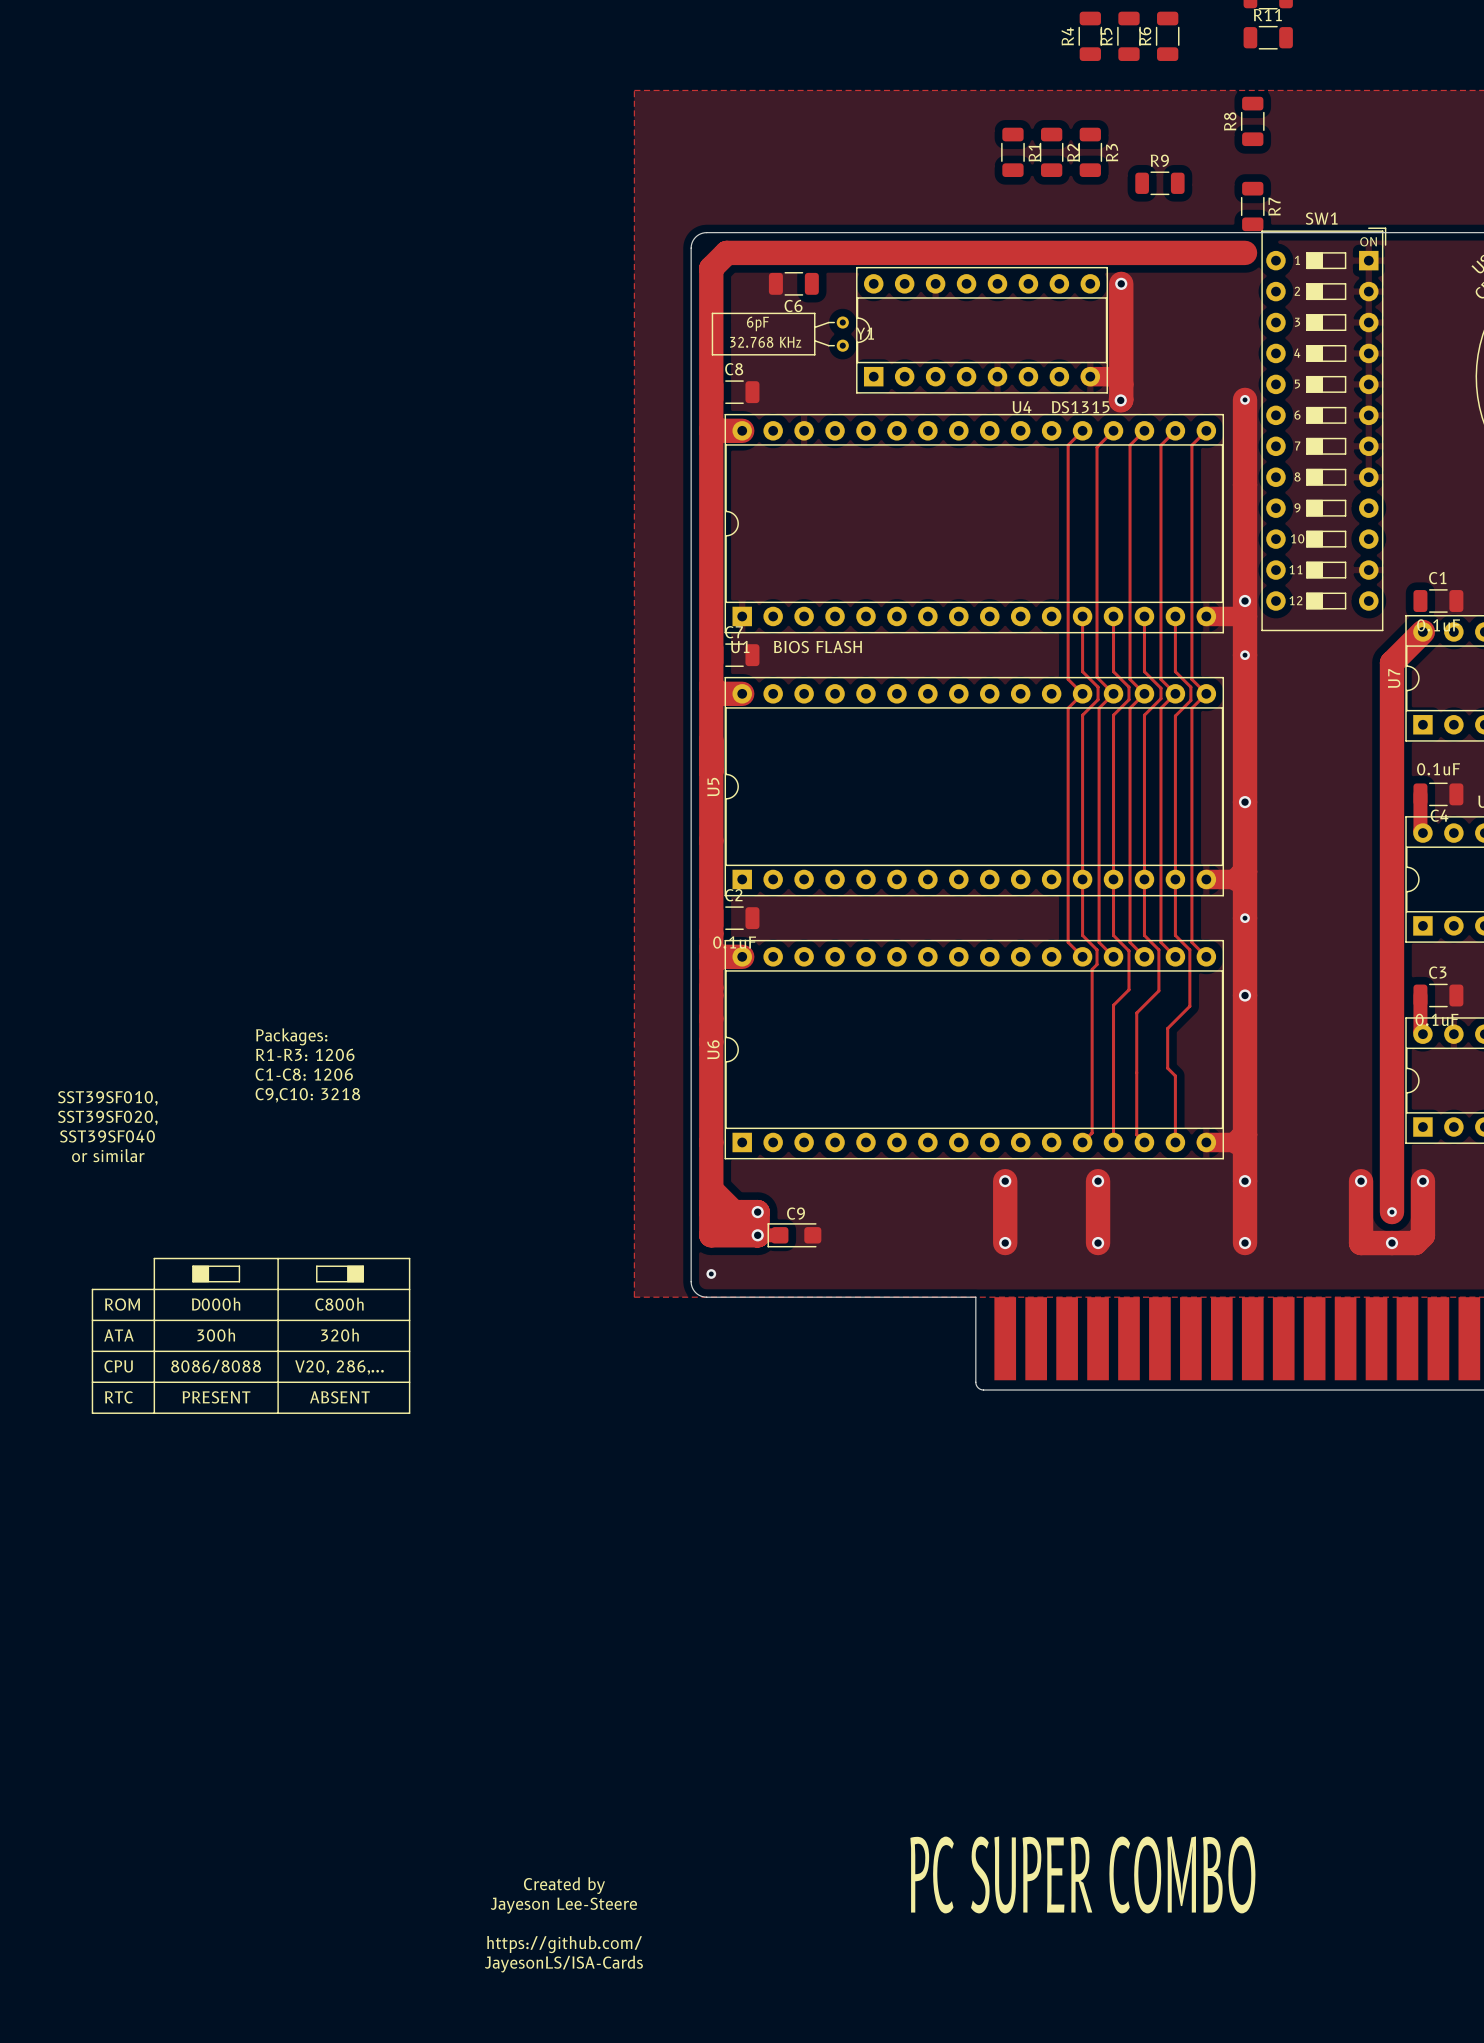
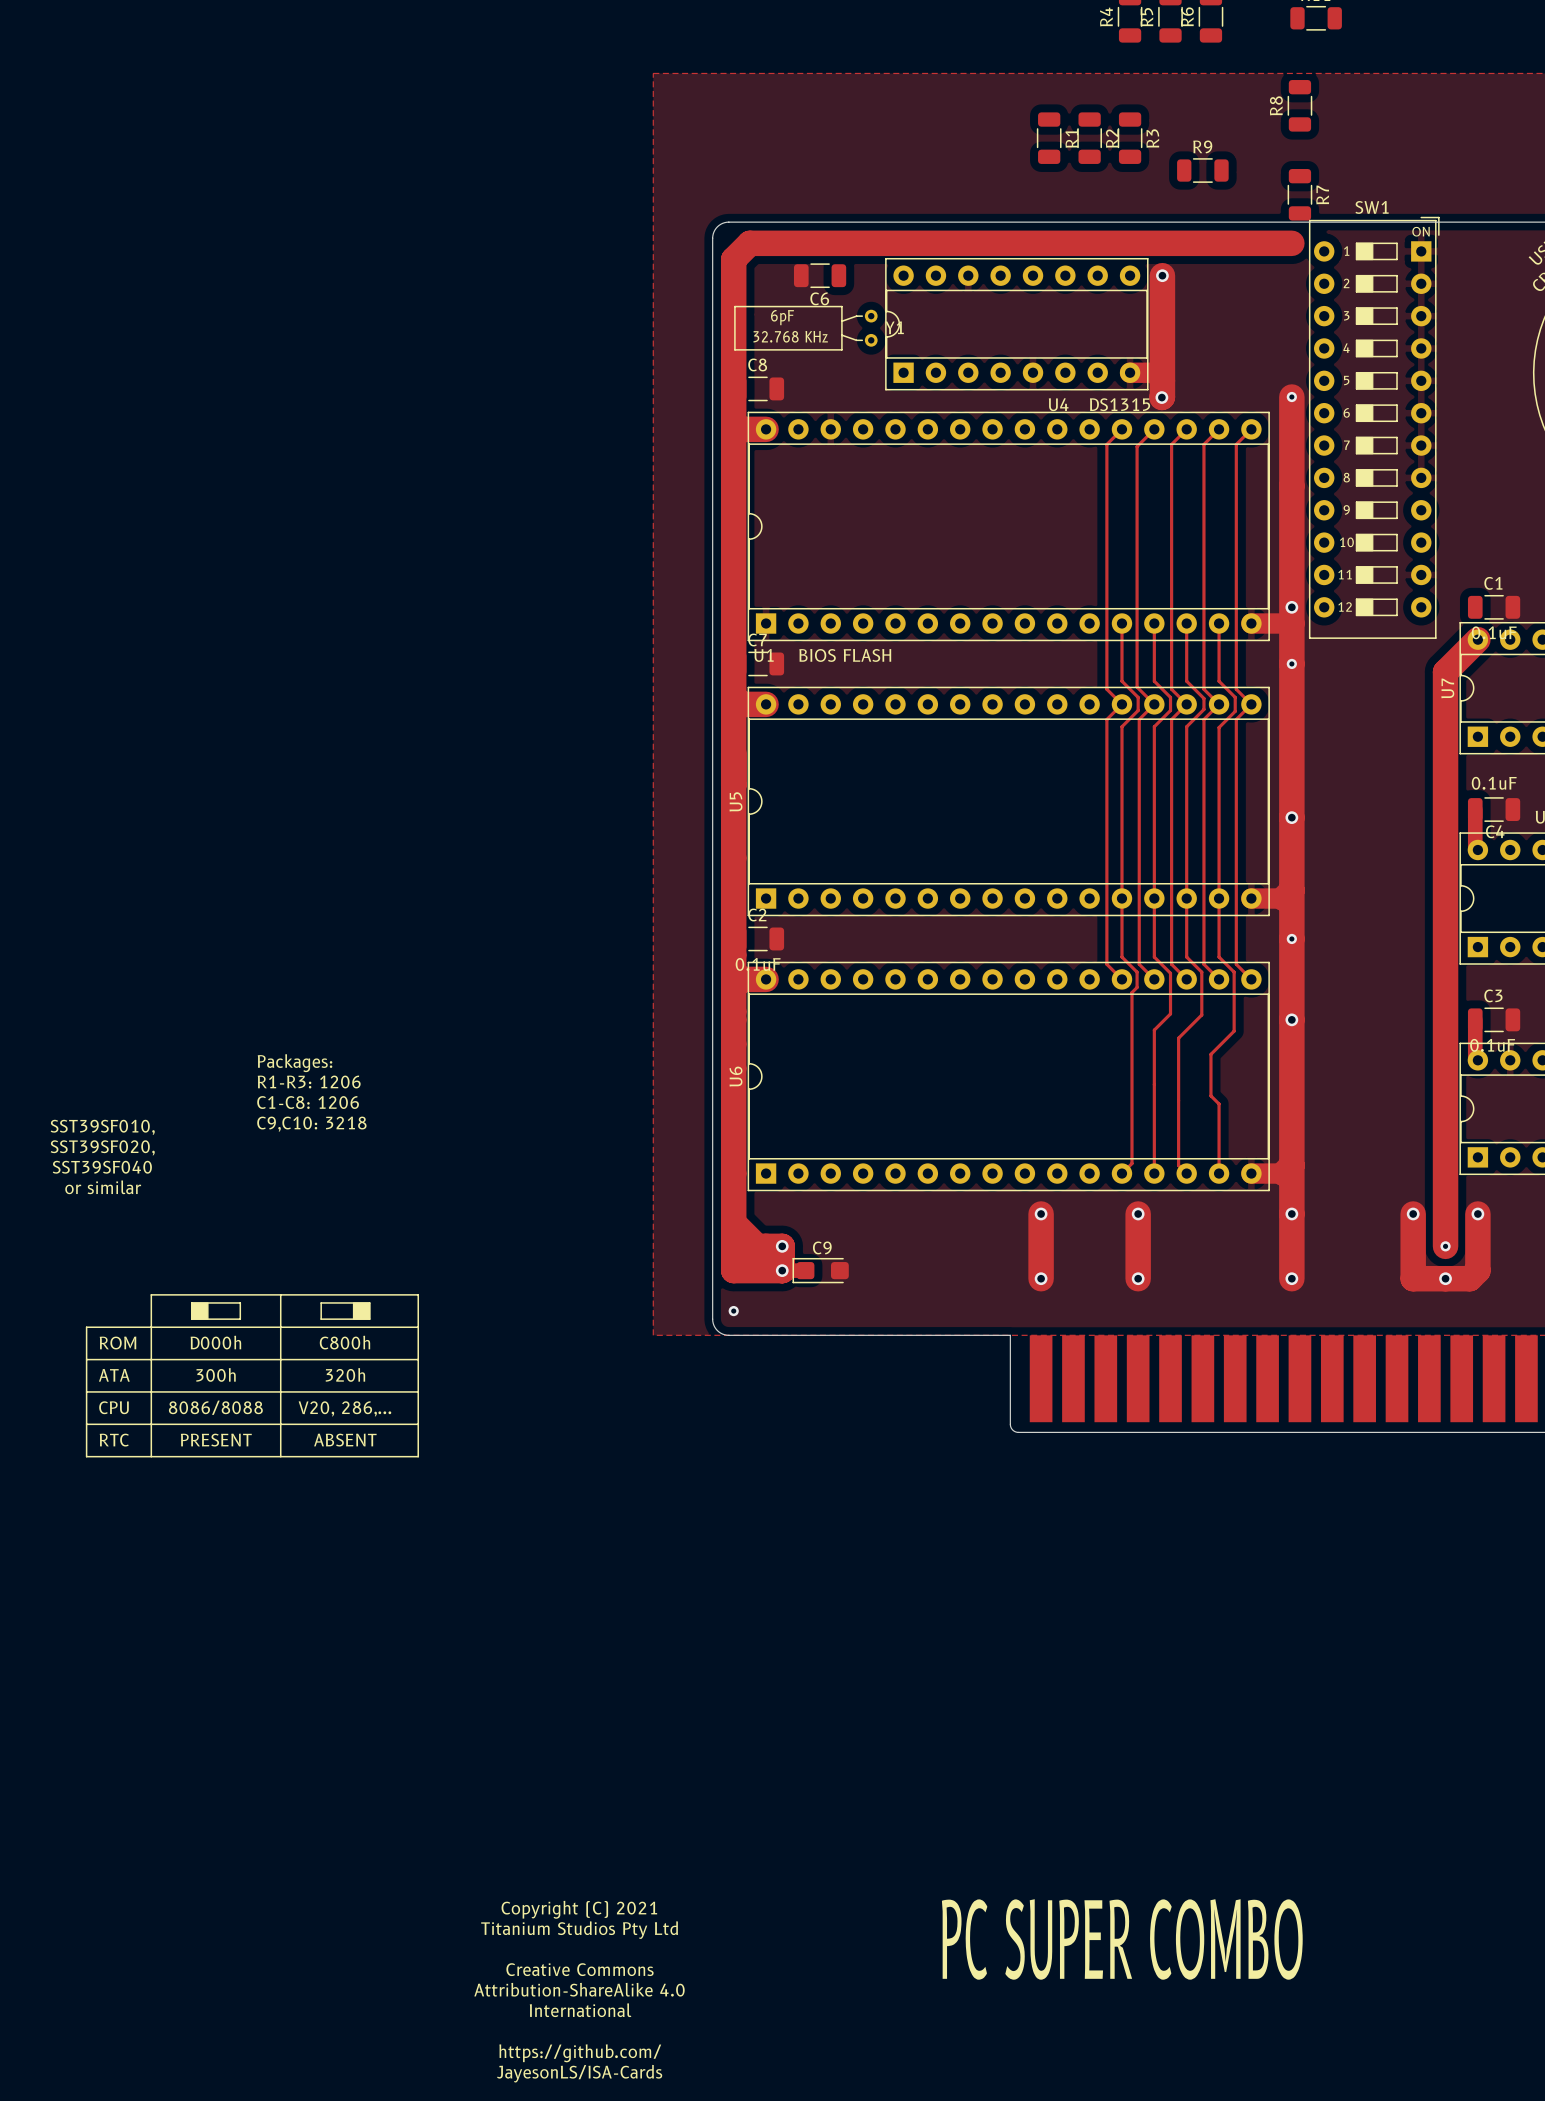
text: none -> Copyright (C) 2021 (579, 1909)
text: none -> Titanium Studios Pty Ltd (579, 1930)
text: Created by (564, 1885) -> none
text: Jayeson Lee-Steere (563, 1905) -> Creative Commons (580, 1969)
text: none -> Attribution-ShareAlike 4.0 (579, 1989)
text: https://github.com/ (564, 1944) -> International (580, 2010)
text position: JayesonLS/ISA-Cards (563, 1964) -> JayesonLS/ISA-Cards (579, 2073)
text: none -> https://github.com/ (580, 2053)

